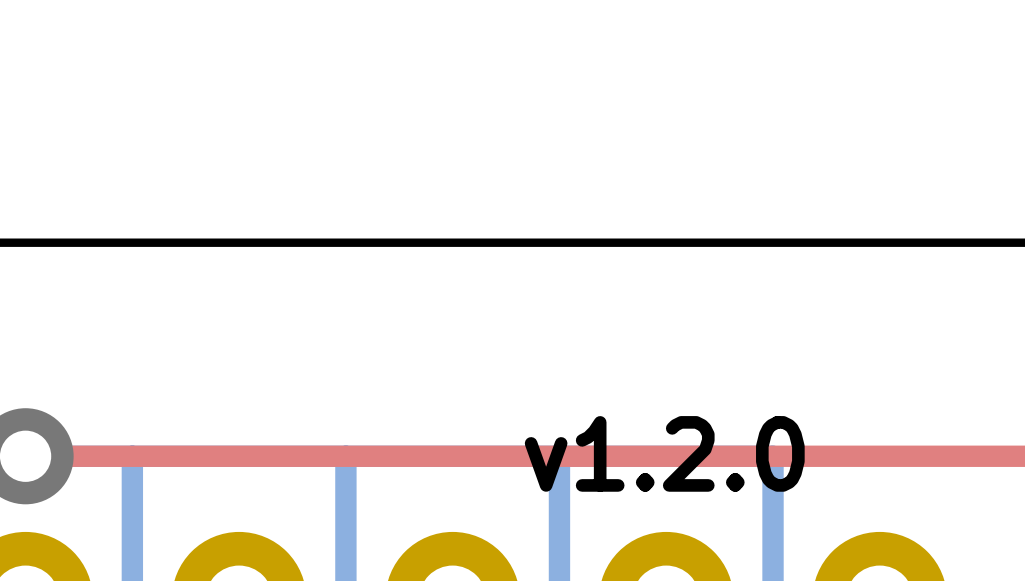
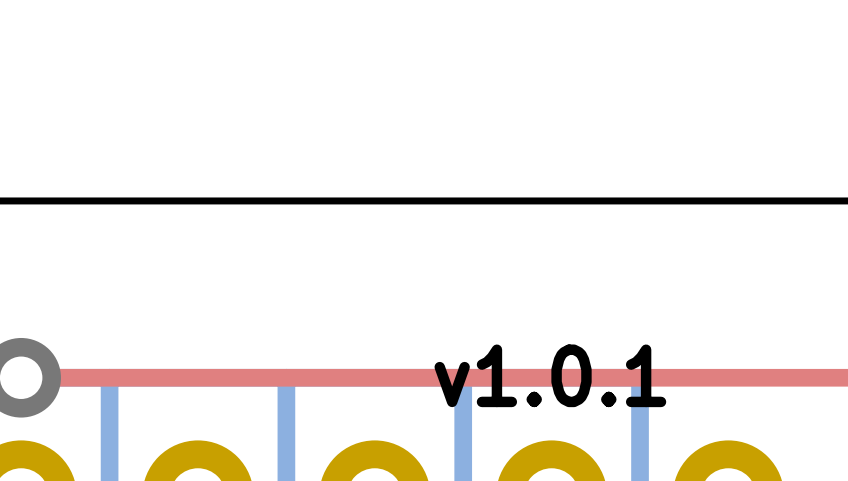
text: v1.2.0 (664, 453) -> v1.0.1 (550, 375)

